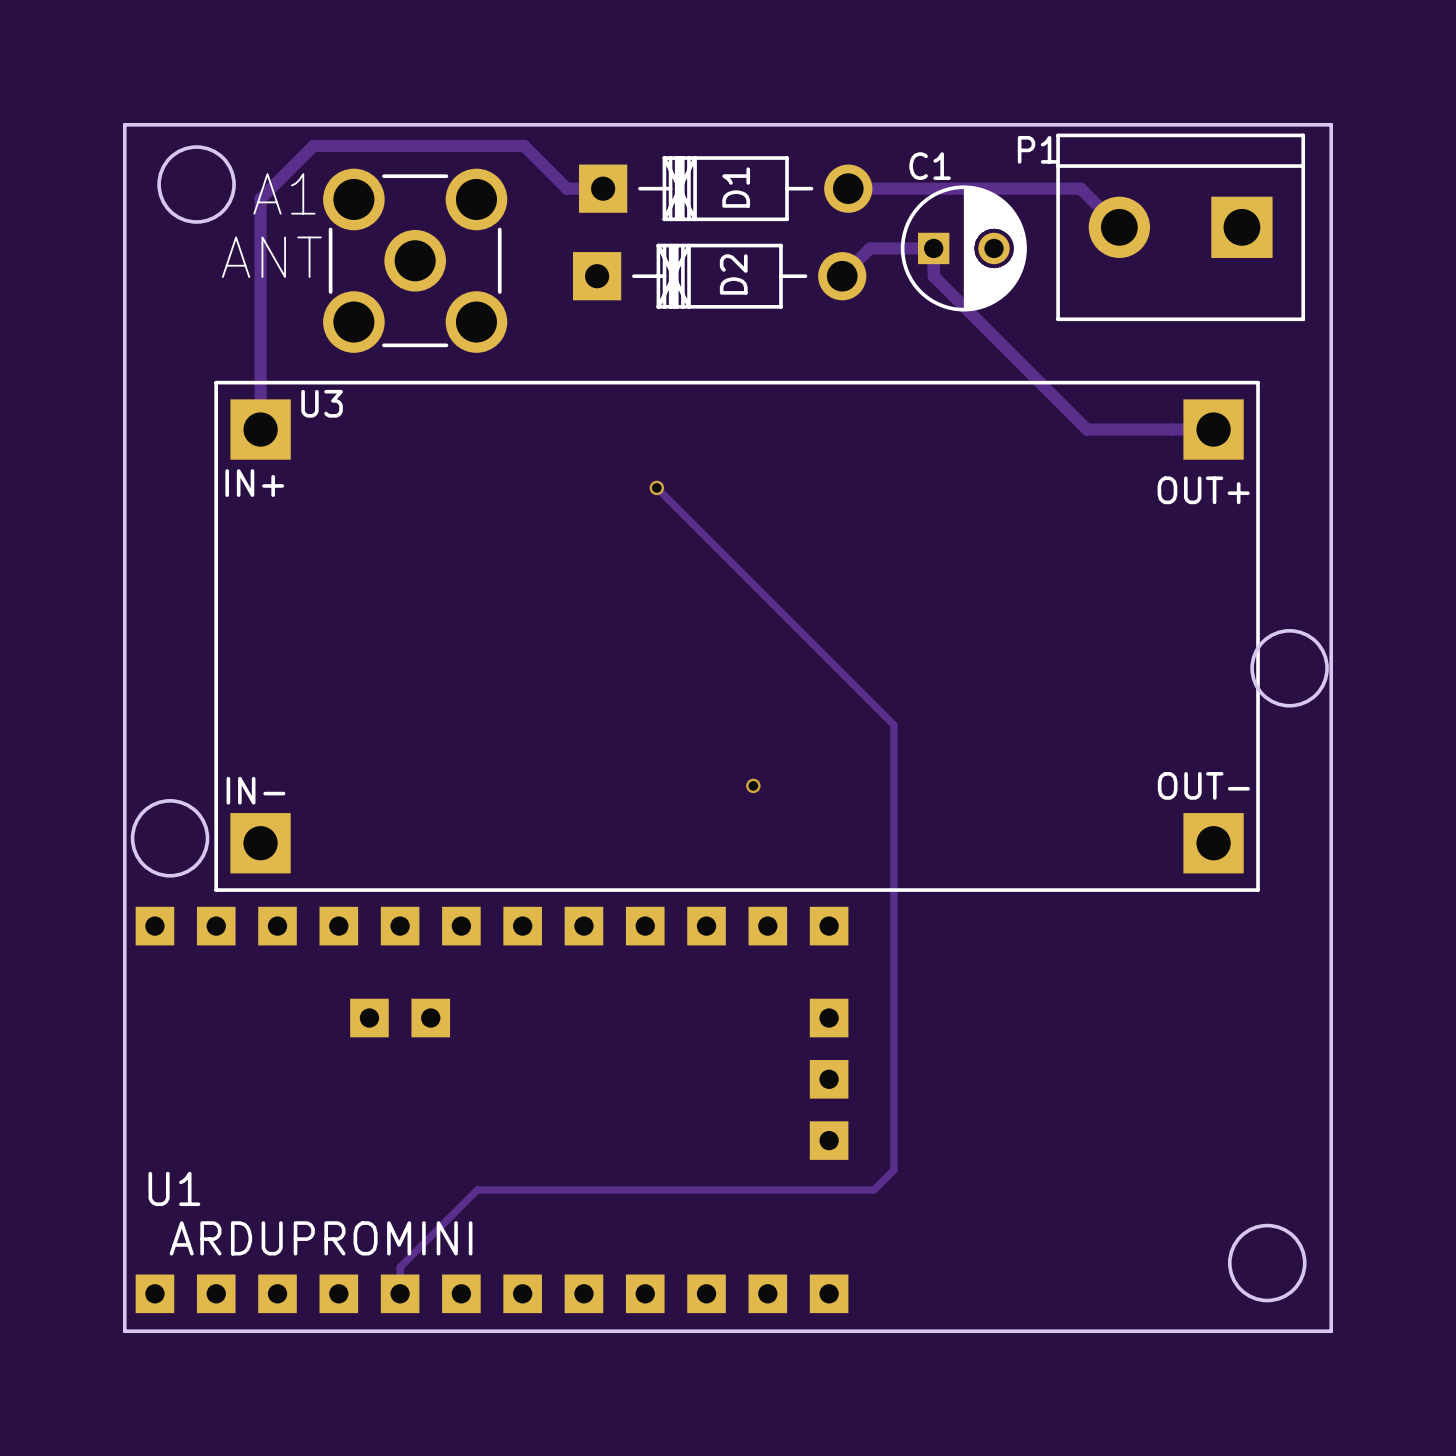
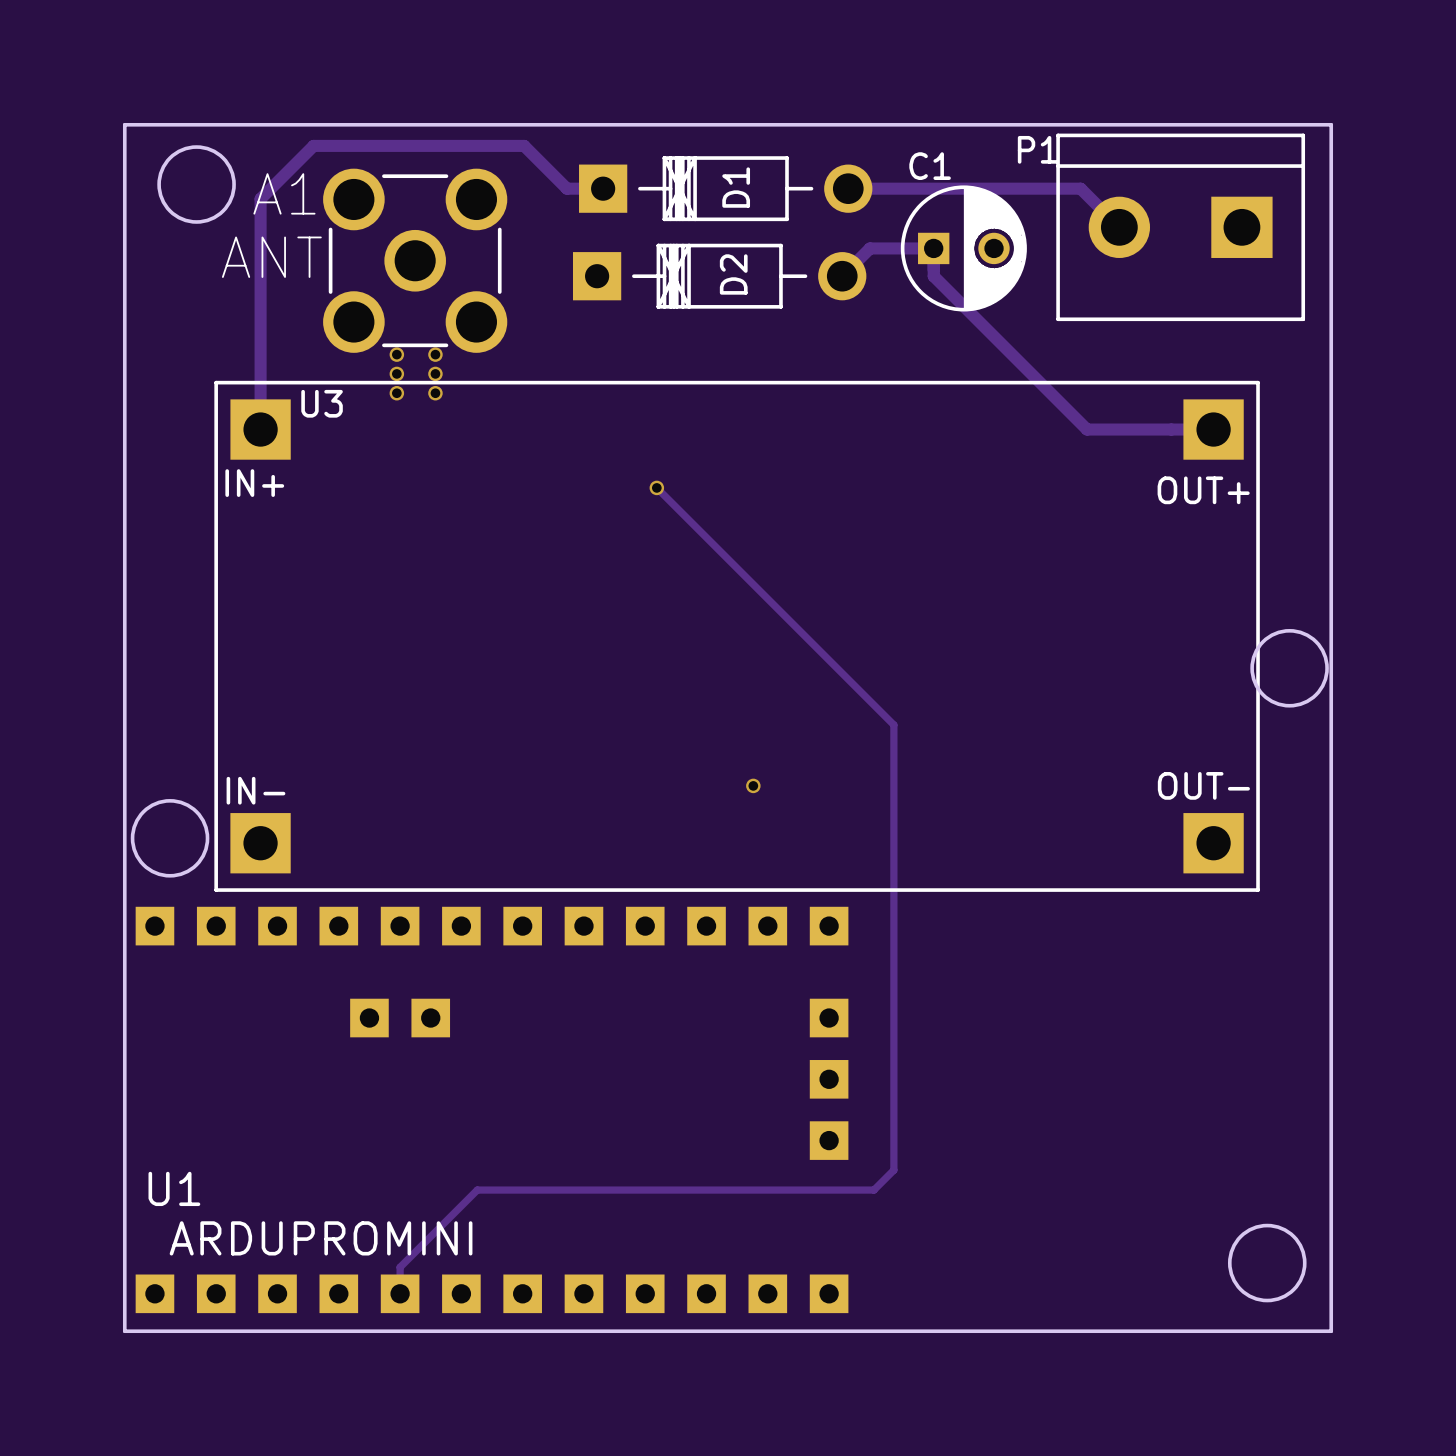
via: none -> (396, 354)
via: none -> (435, 354)
via: none -> (396, 373)
via: none -> (435, 373)
via: none -> (396, 393)
via: none -> (435, 393)

